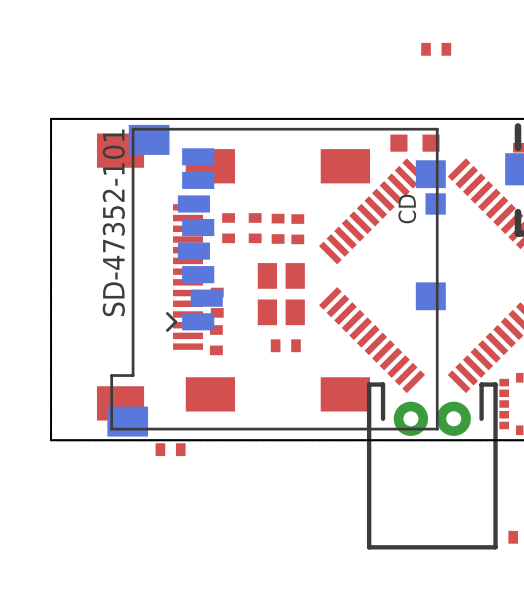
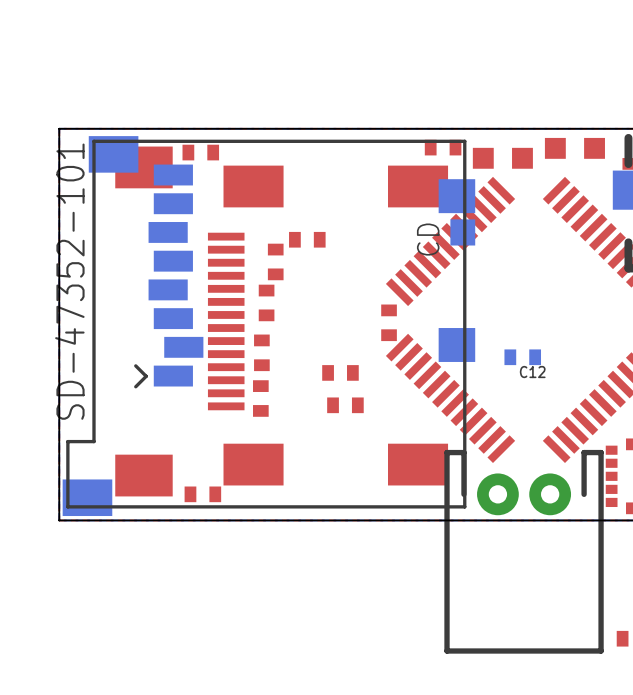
part: (436, 49) -> none
part: none -> (443, 147)
part: none -> (574, 148)
part: none -> (200, 152)
part: none -> (307, 239)
C12 side: top (255, 228) -> bottom (522, 357)
part: (278, 228) -> none
part: (297, 229) -> none
part: none -> (266, 302)
part: none -> (389, 322)
part position: (276, 280) -> (268, 326)
part: (281, 294) -> none
part: none -> (340, 372)
part position: (170, 449) -> (202, 494)

